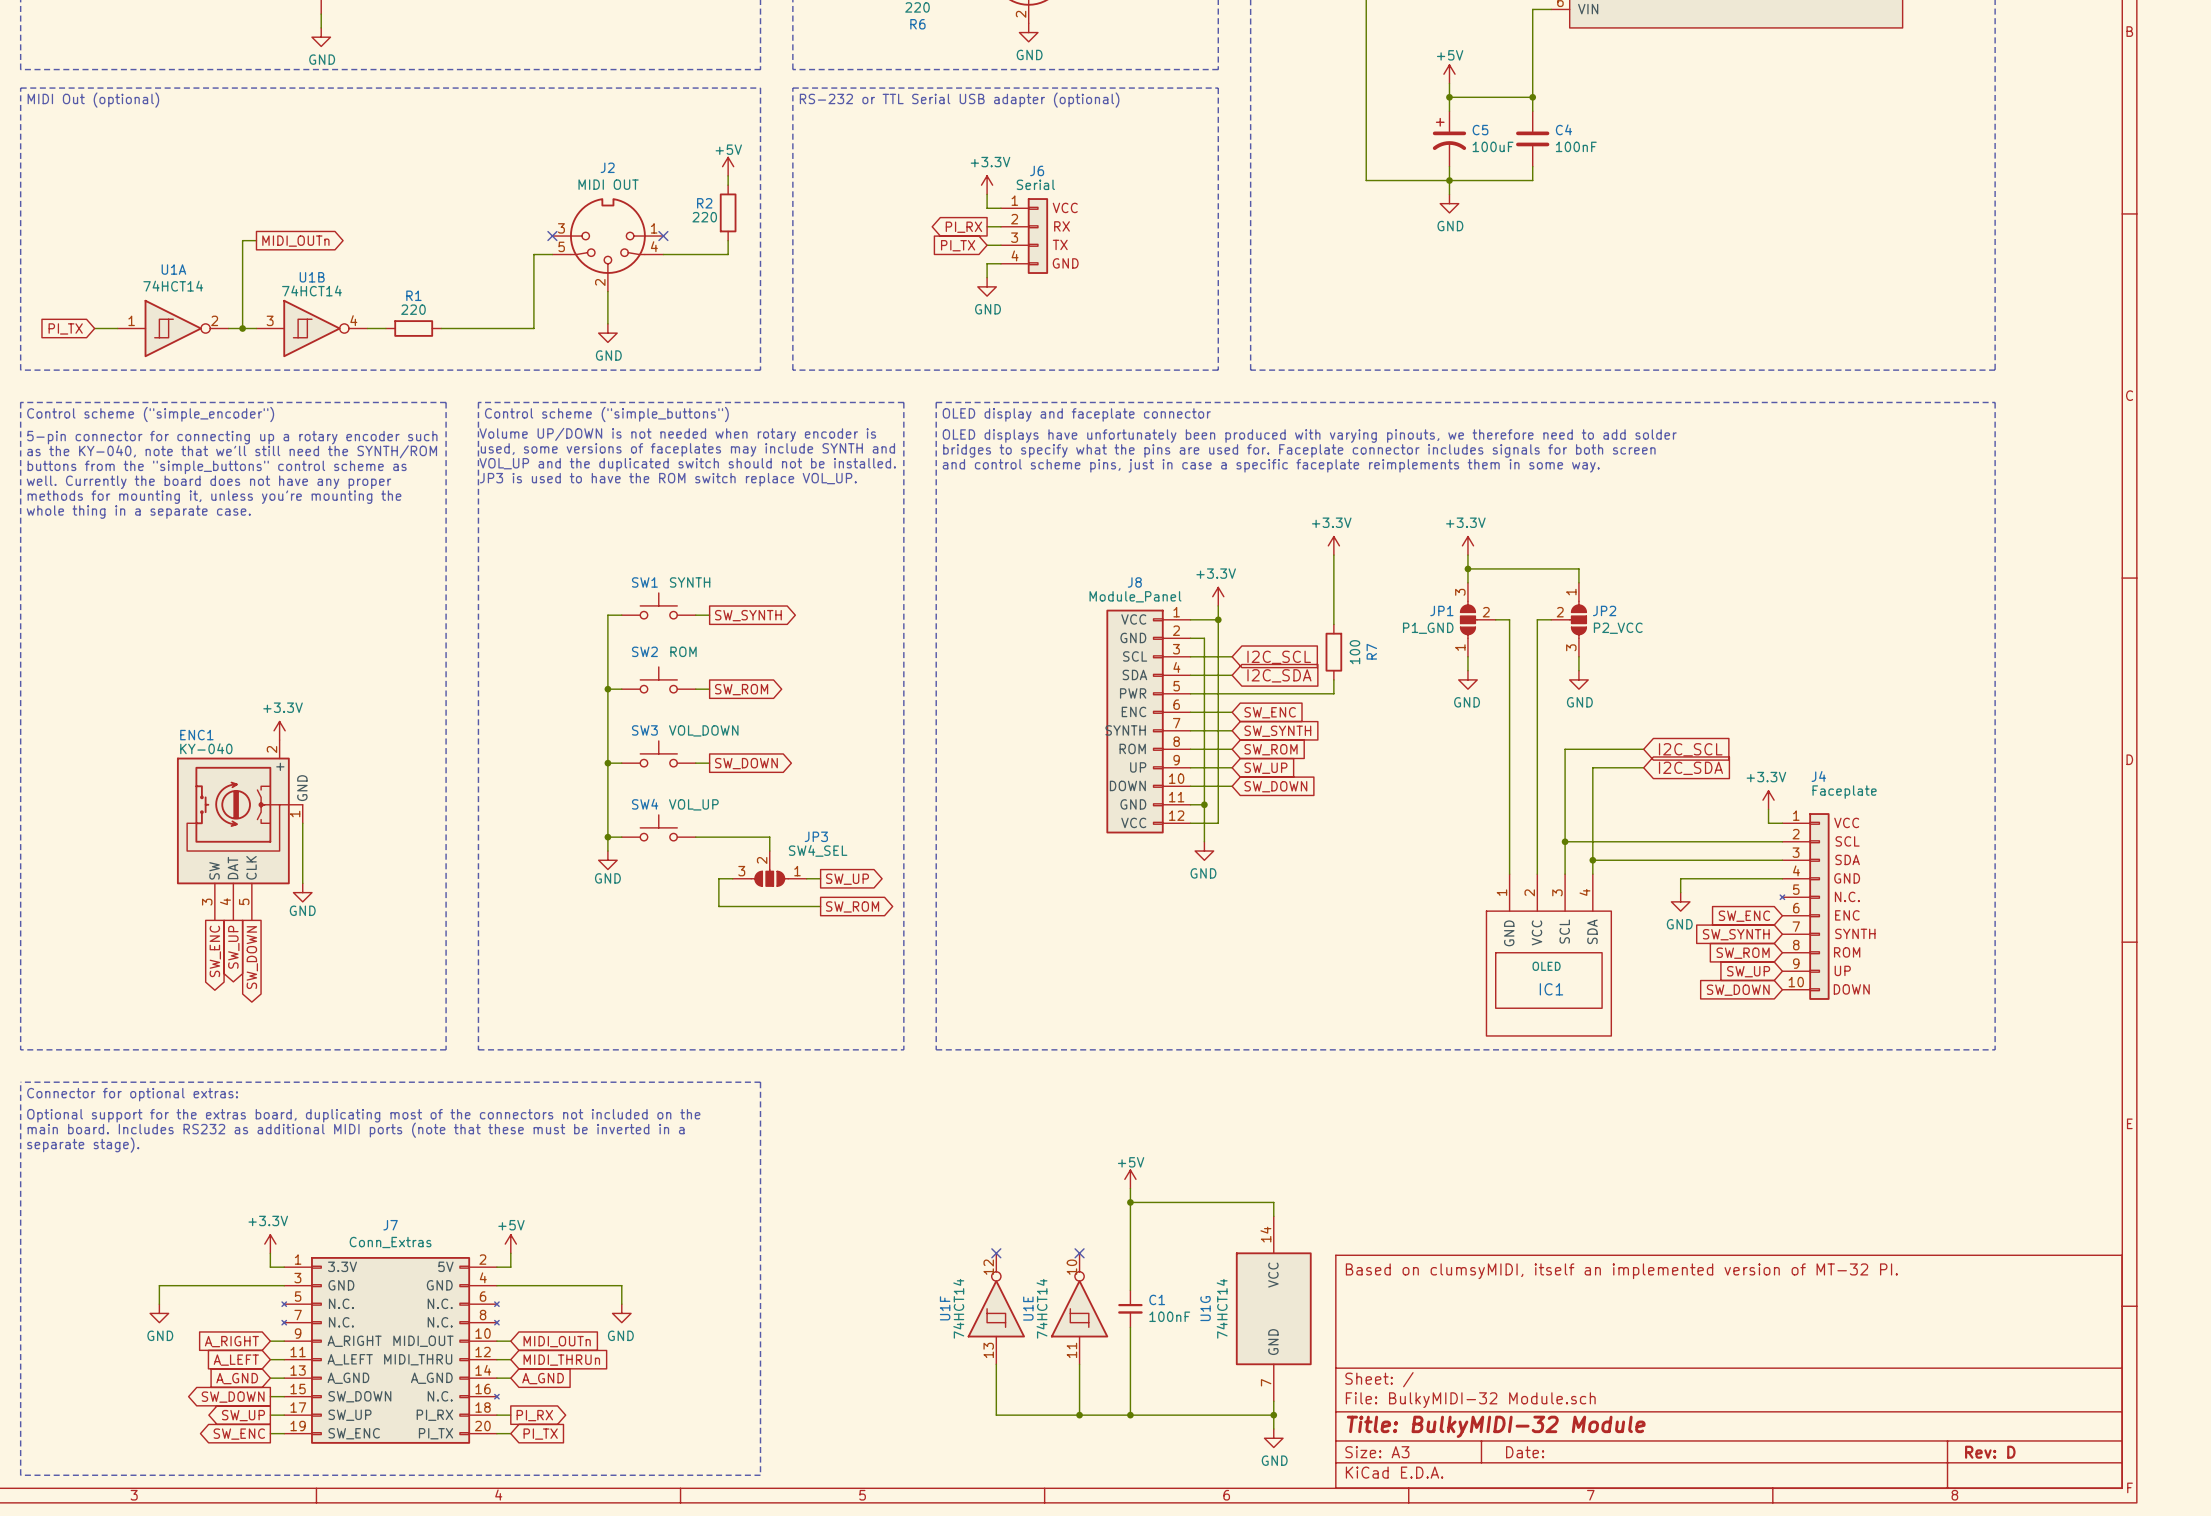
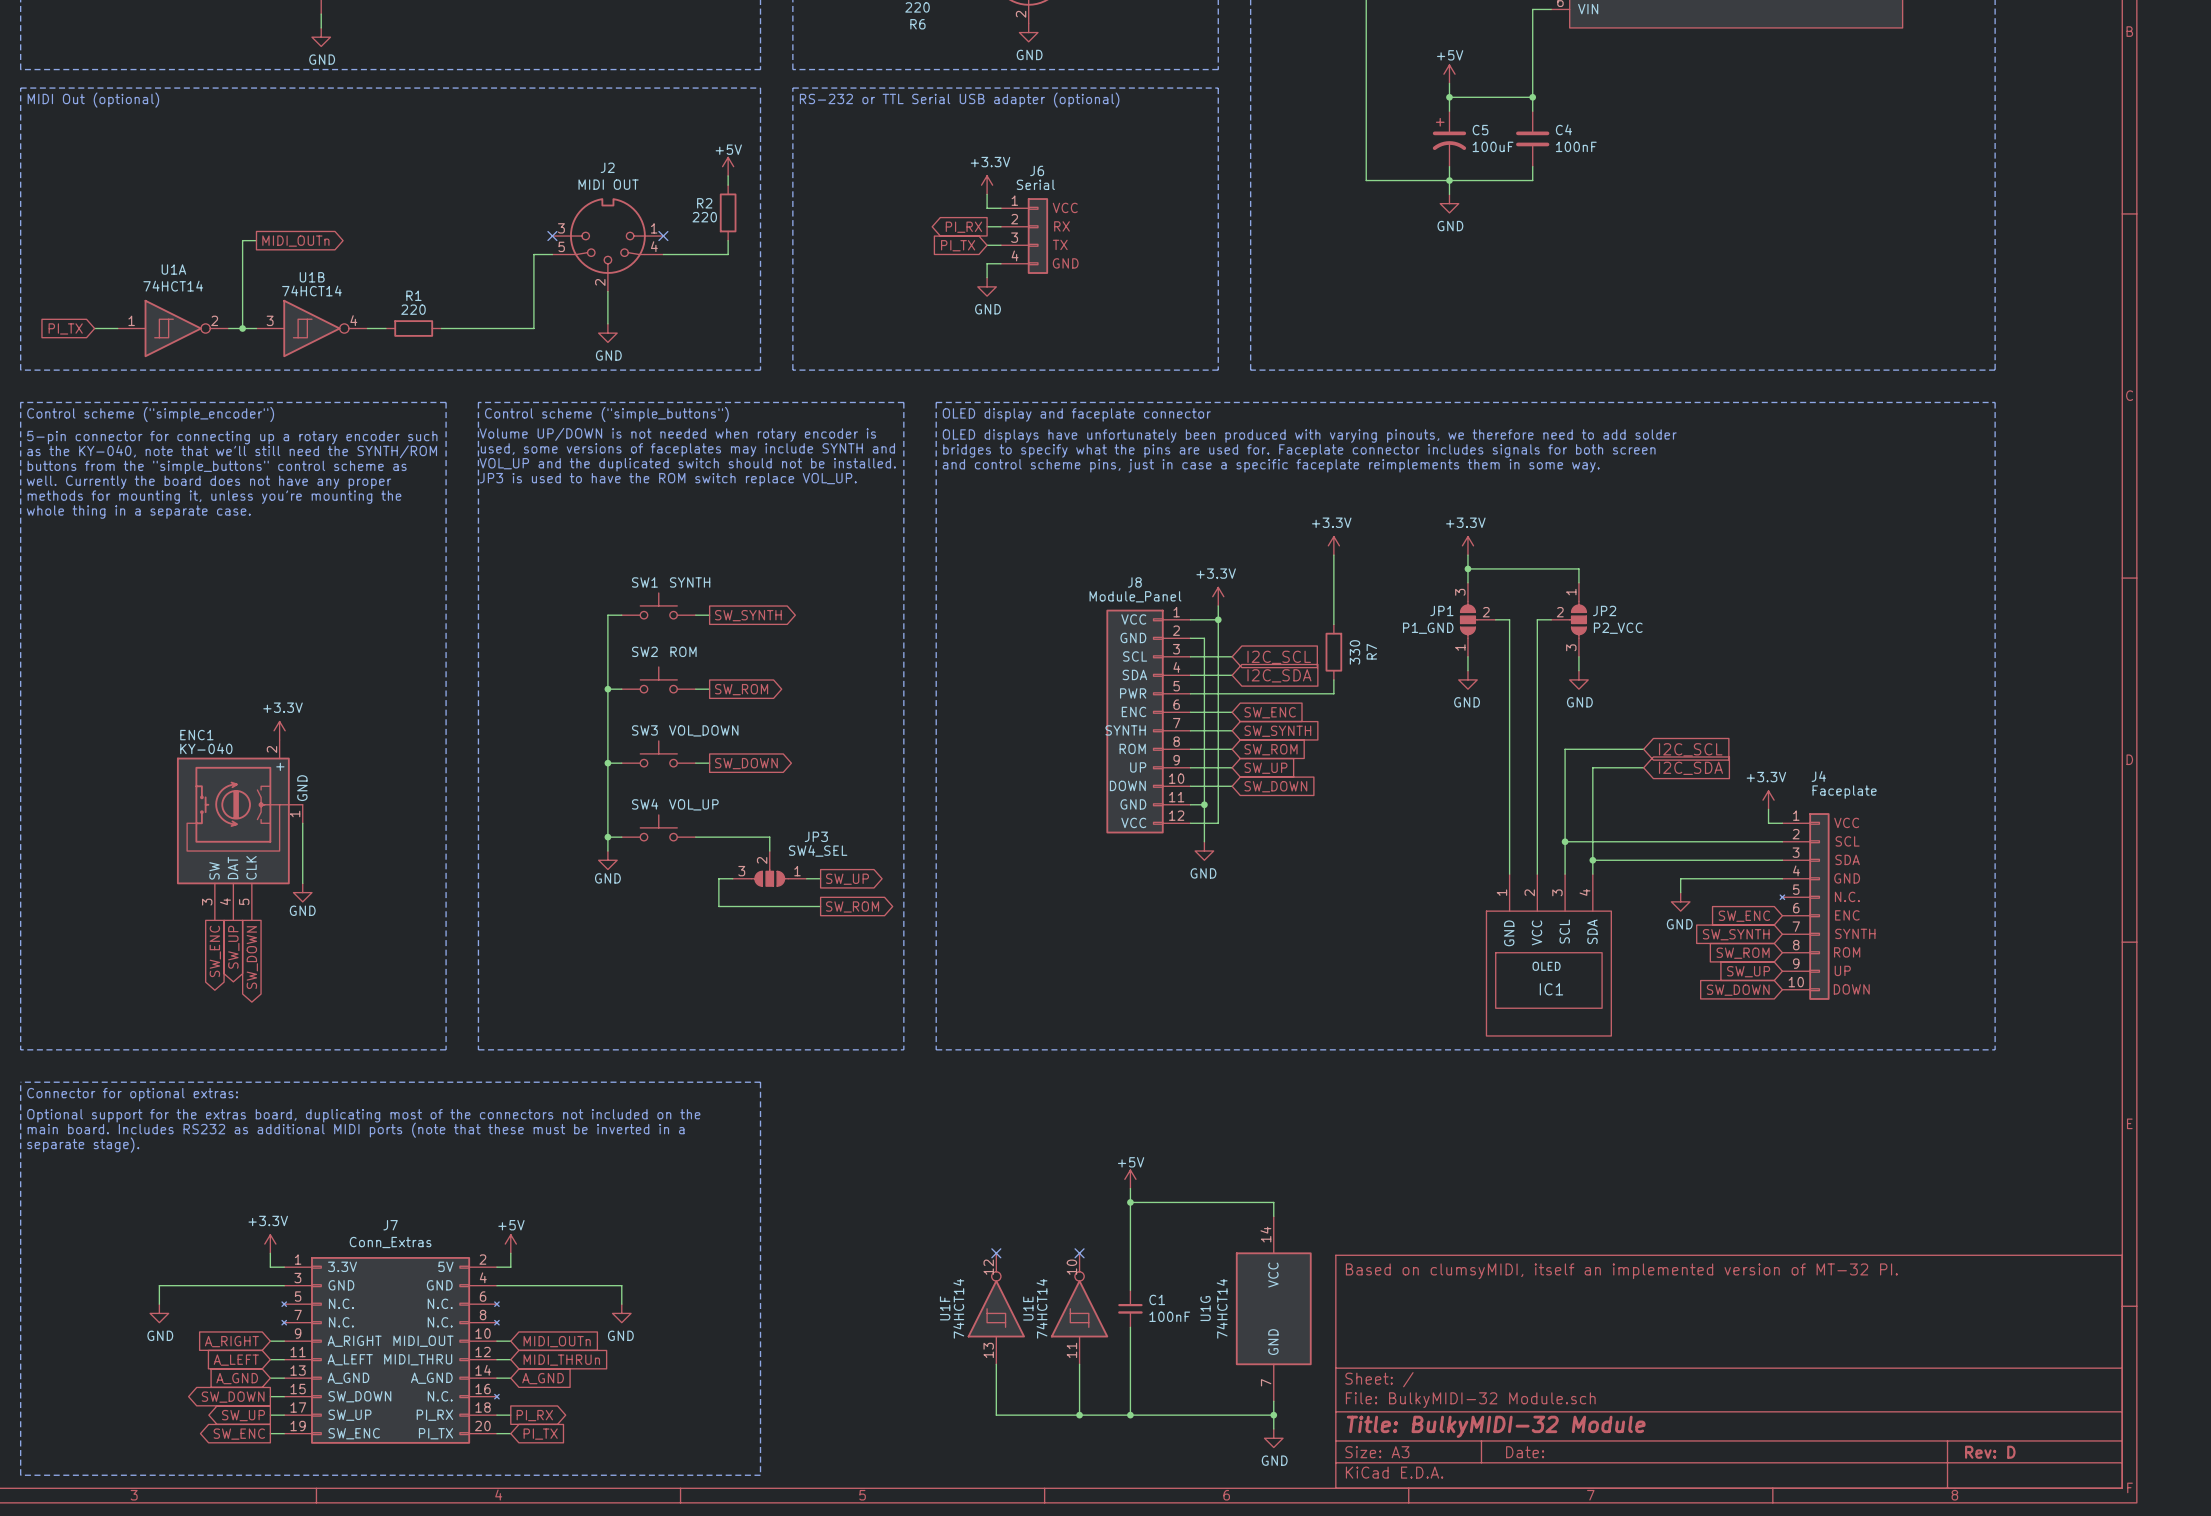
R7 value: 100 (1354, 652) -> 330 (1354, 652)

